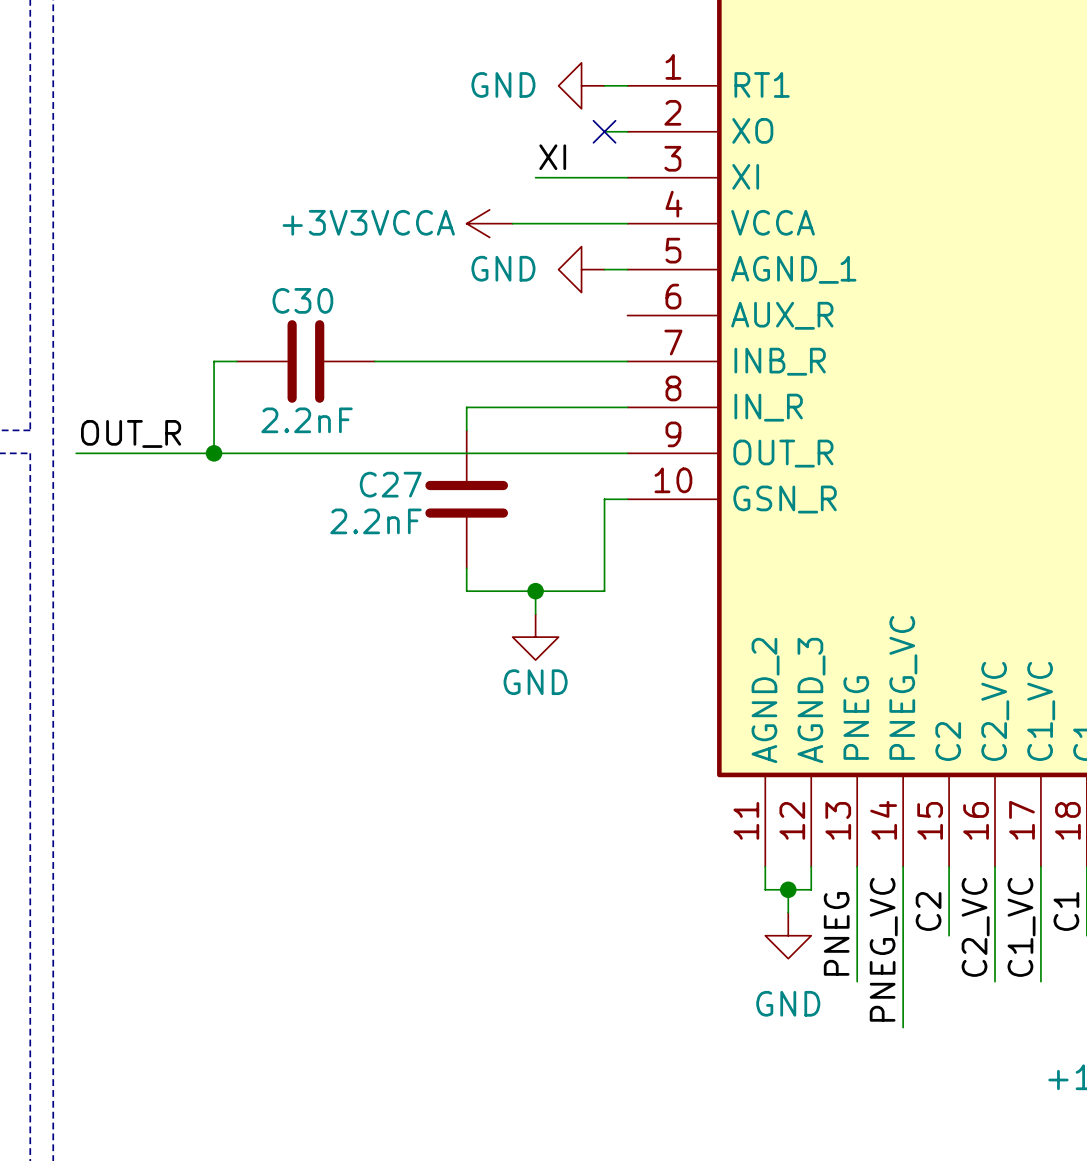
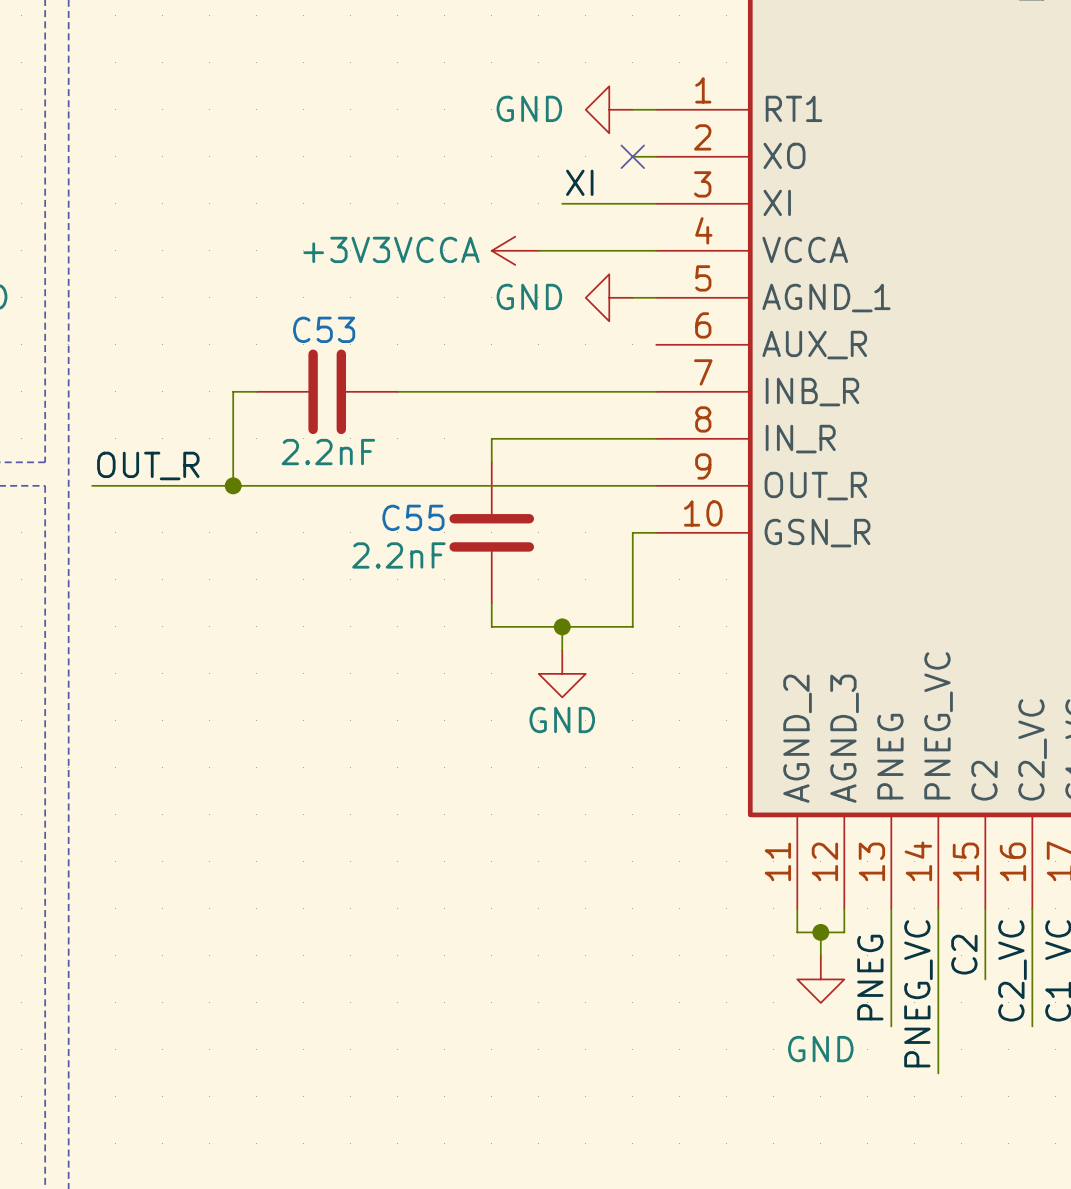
C30 name: C30 (302, 300) -> C53 (324, 329)
C27 name: C27 (390, 484) -> C55 (413, 517)

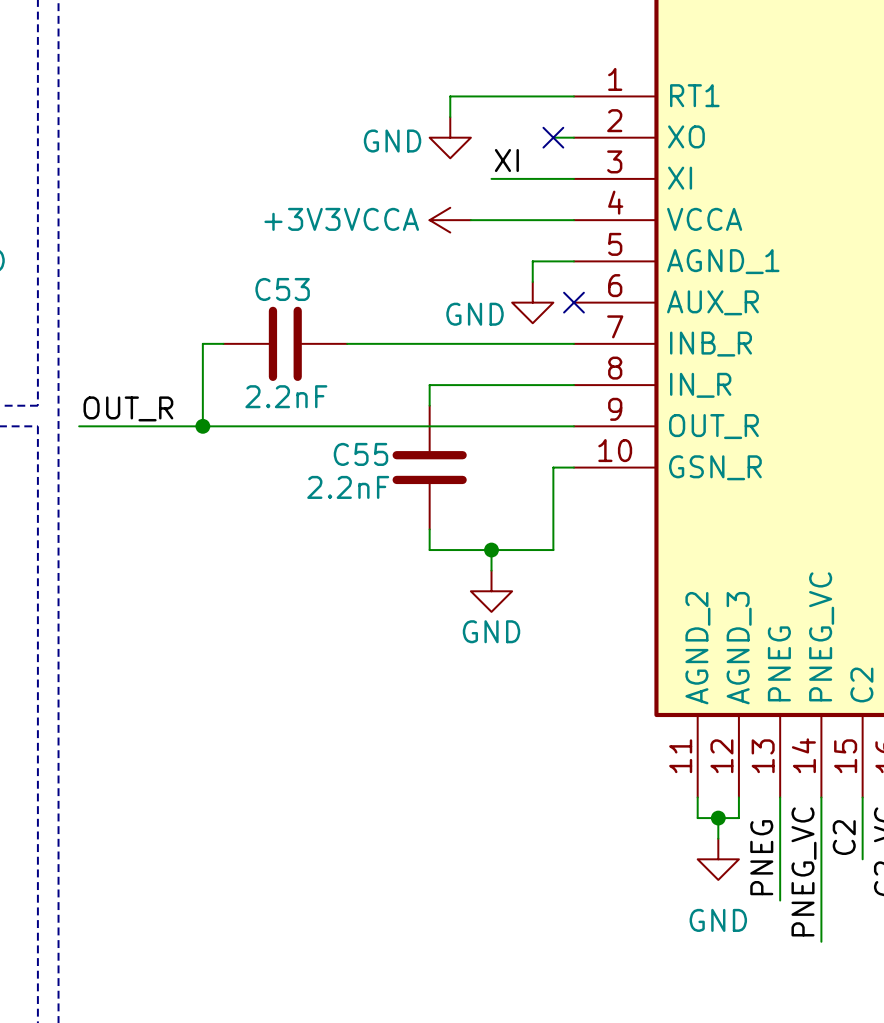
power symbol: GND (609, 109) -> none
wire: none -> (553, 96) (450, 96) (450, 117)
power symbol: none -> GND (450, 137)
power symbol rotation: 0° (609, 297) -> 90° counterclockwise (532, 302)
power symbol position: GND (609, 297) -> GND (532, 302)
no-connect mark: none -> (573, 302)

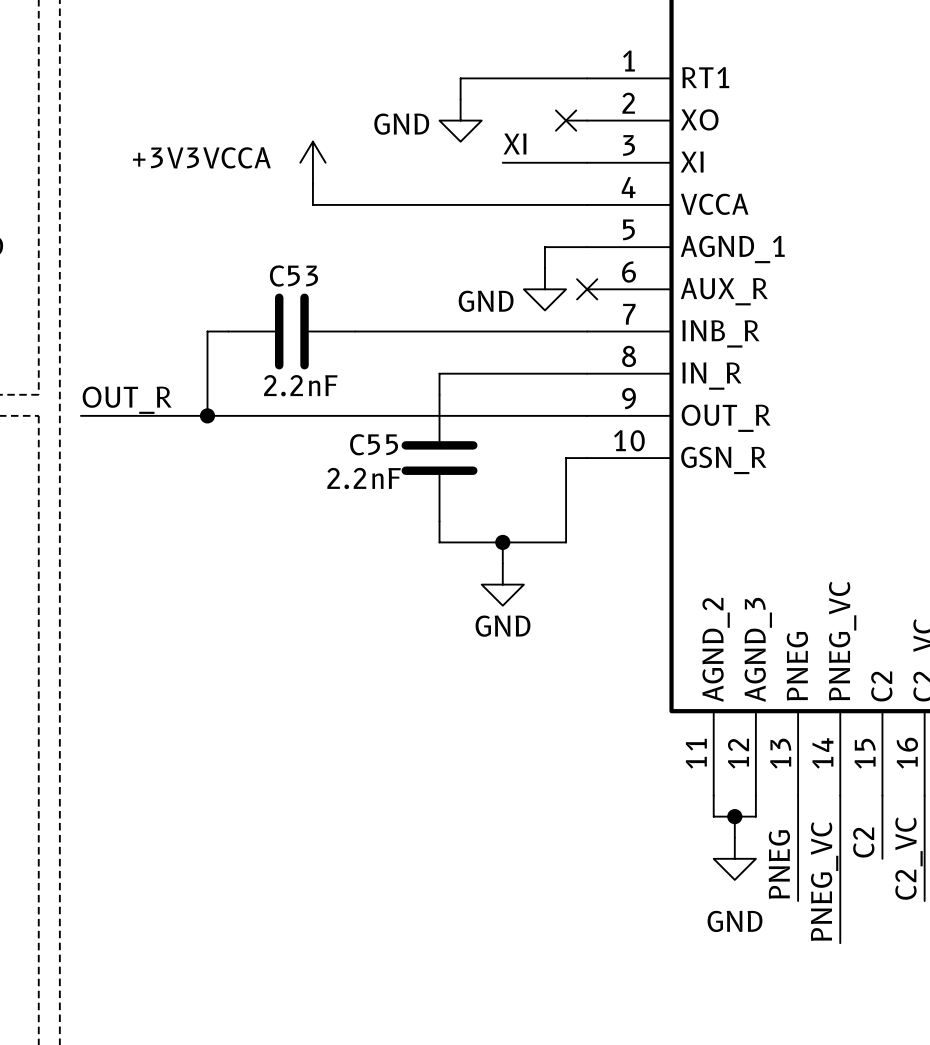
wire: none -> (312, 183) (312, 204) (481, 204)
power symbol text position: +3V3VCCA (341, 219) -> +3V3VCCA (201, 157)
power symbol rotation: 0° (450, 220) -> 90° clockwise (312, 162)
power symbol position: +3V3VCCA (450, 220) -> +3V3VCCA (312, 162)

